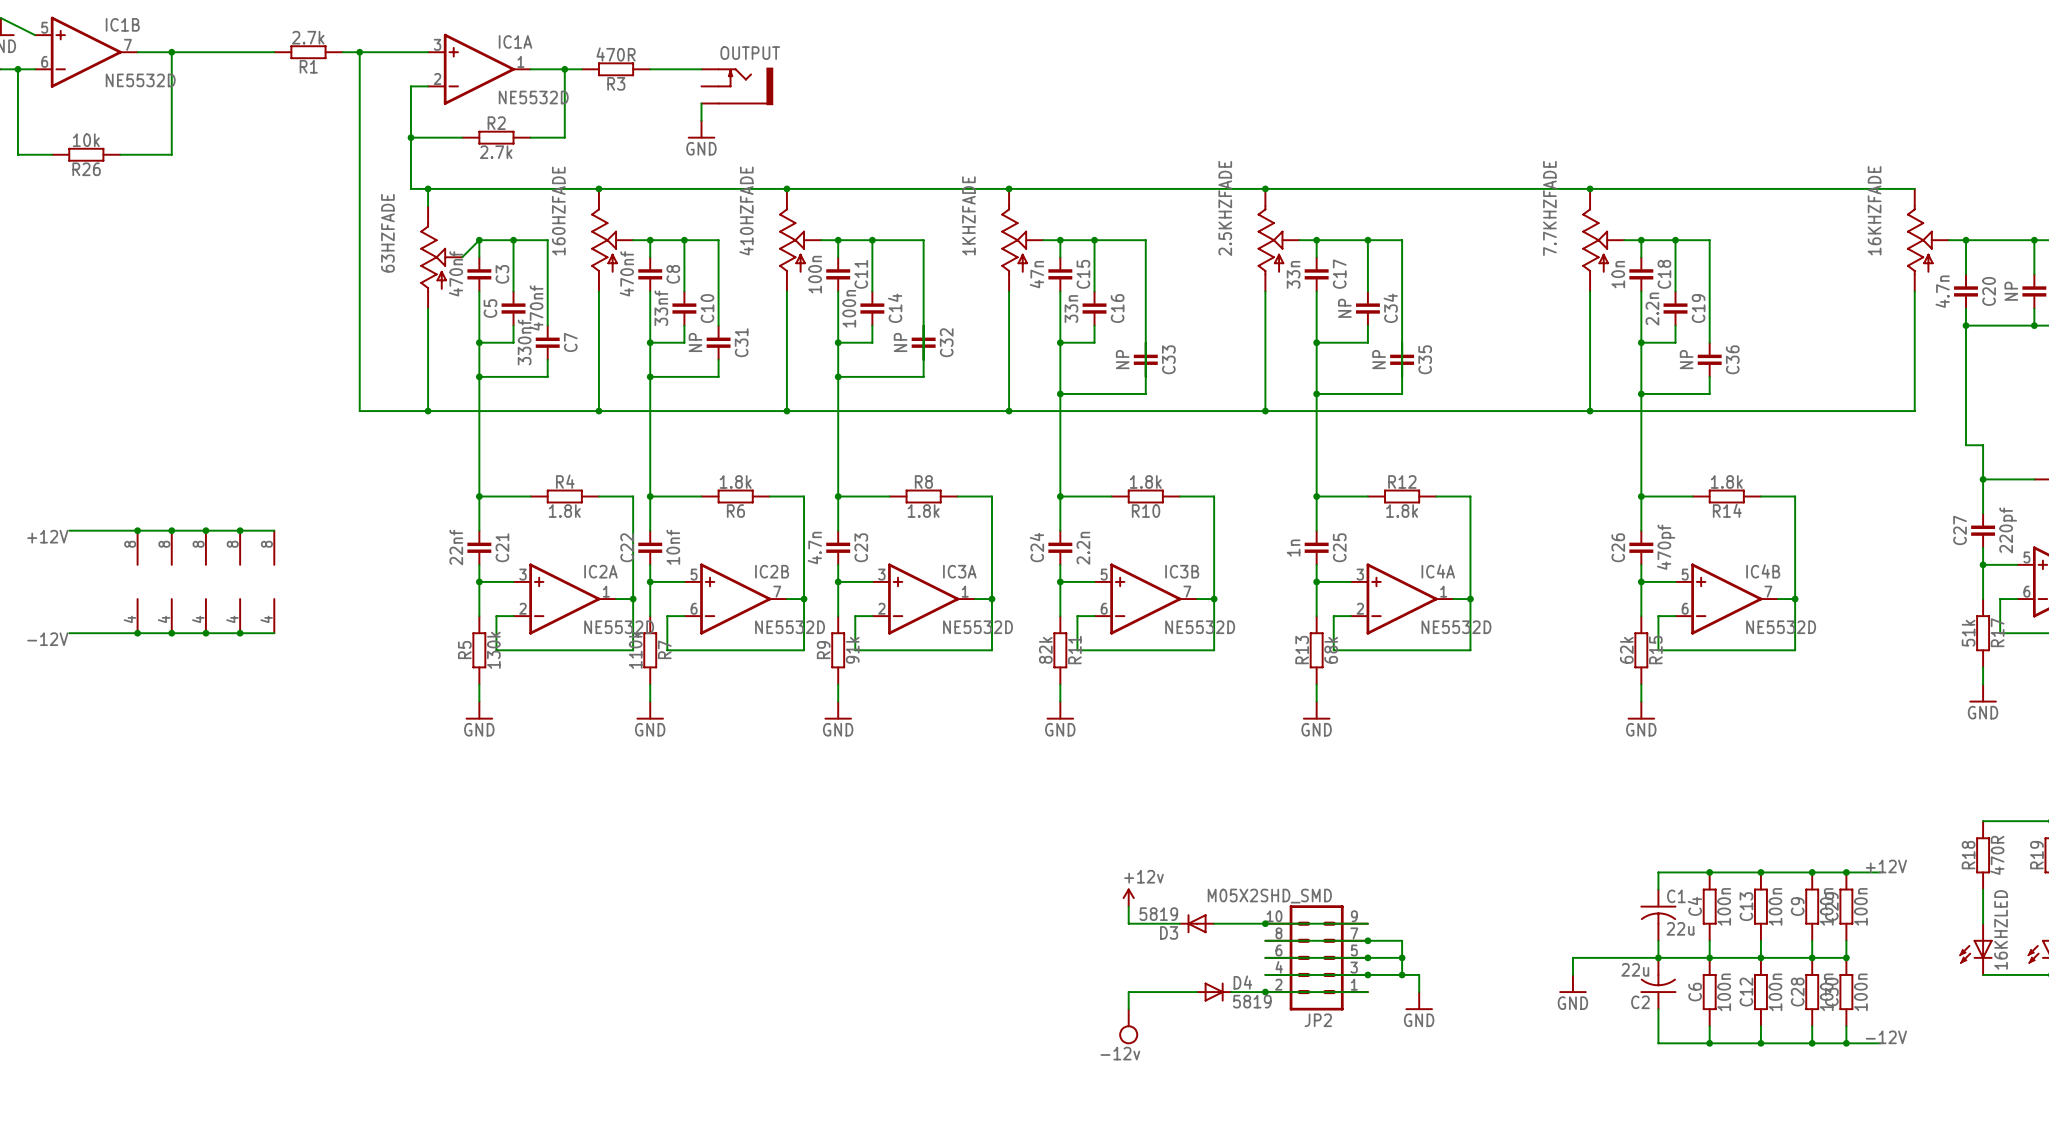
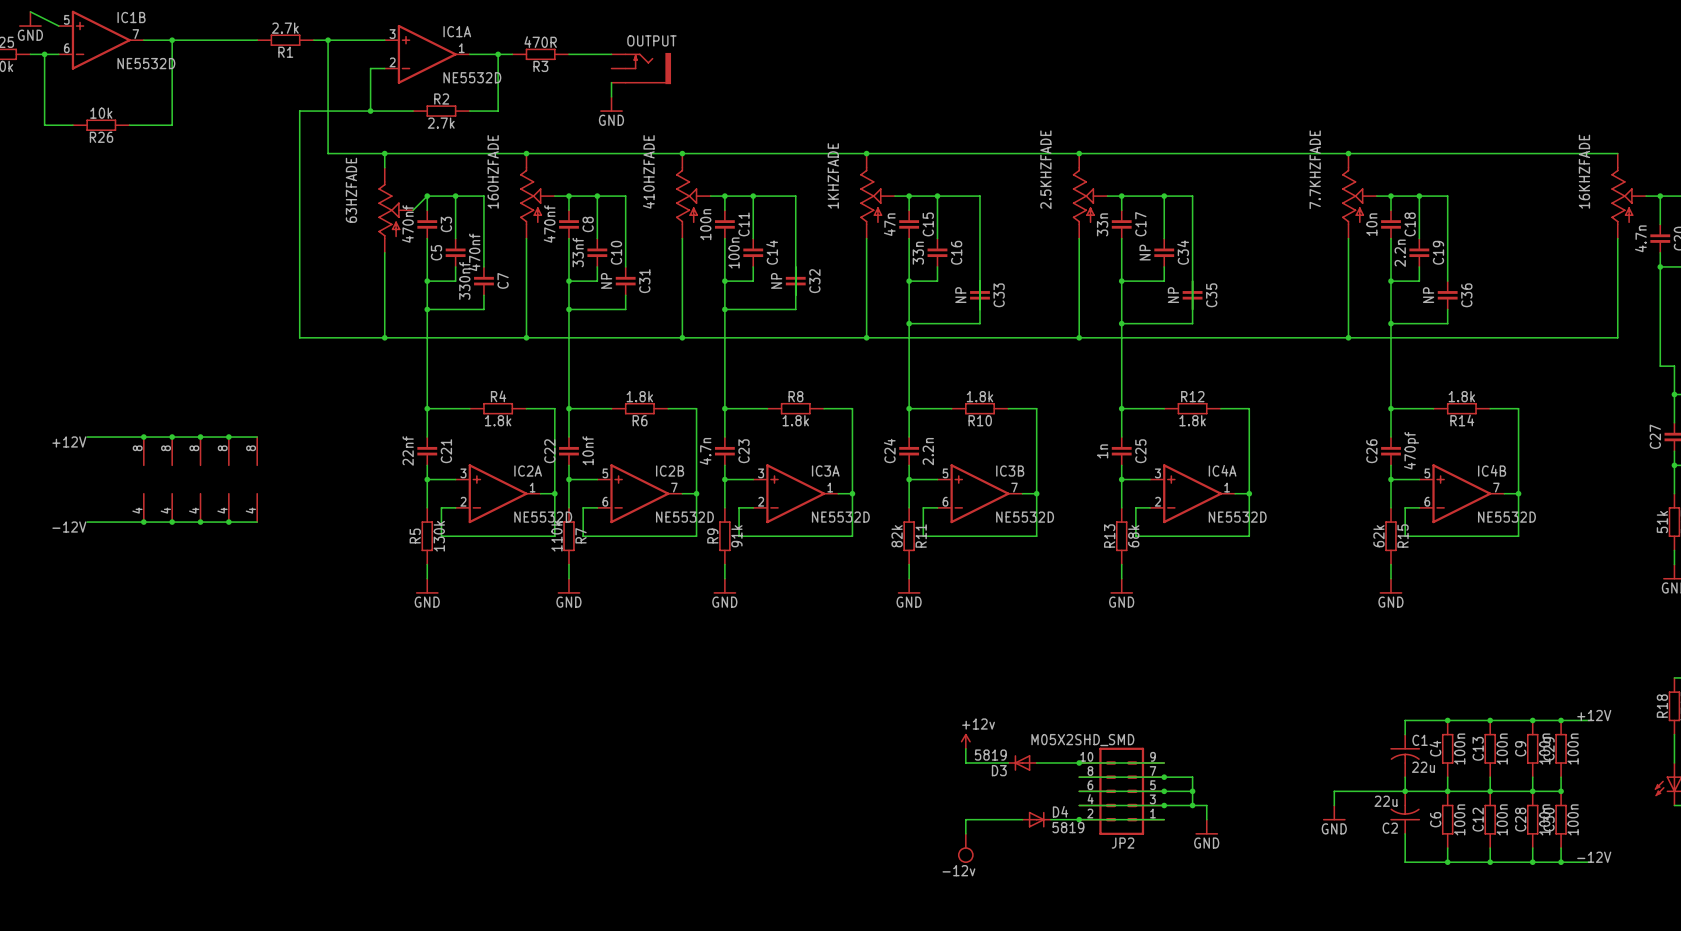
wire: (411, 137) (411, 188) -> (328, 153) (370, 153)
wire: (359, 188) (359, 411) -> (370, 111) (299, 111) (299, 337) (328, 337)

